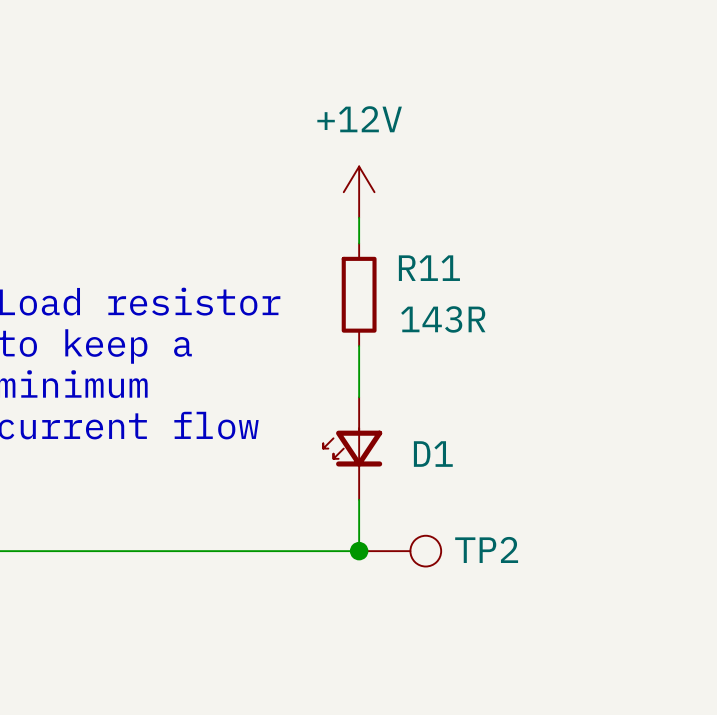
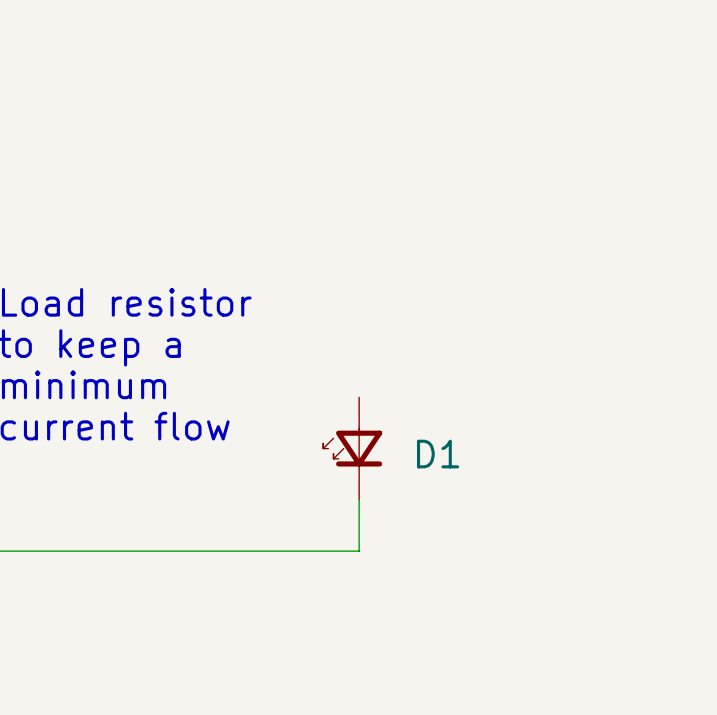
power symbol: +12V (359, 192) -> none
wire: (359, 217) (359, 243) -> none
R11: 143R (359, 294) -> none
wire: (359, 346) (359, 397) -> none
junction: (359, 551) -> none
TP2: (400, 551) -> none

